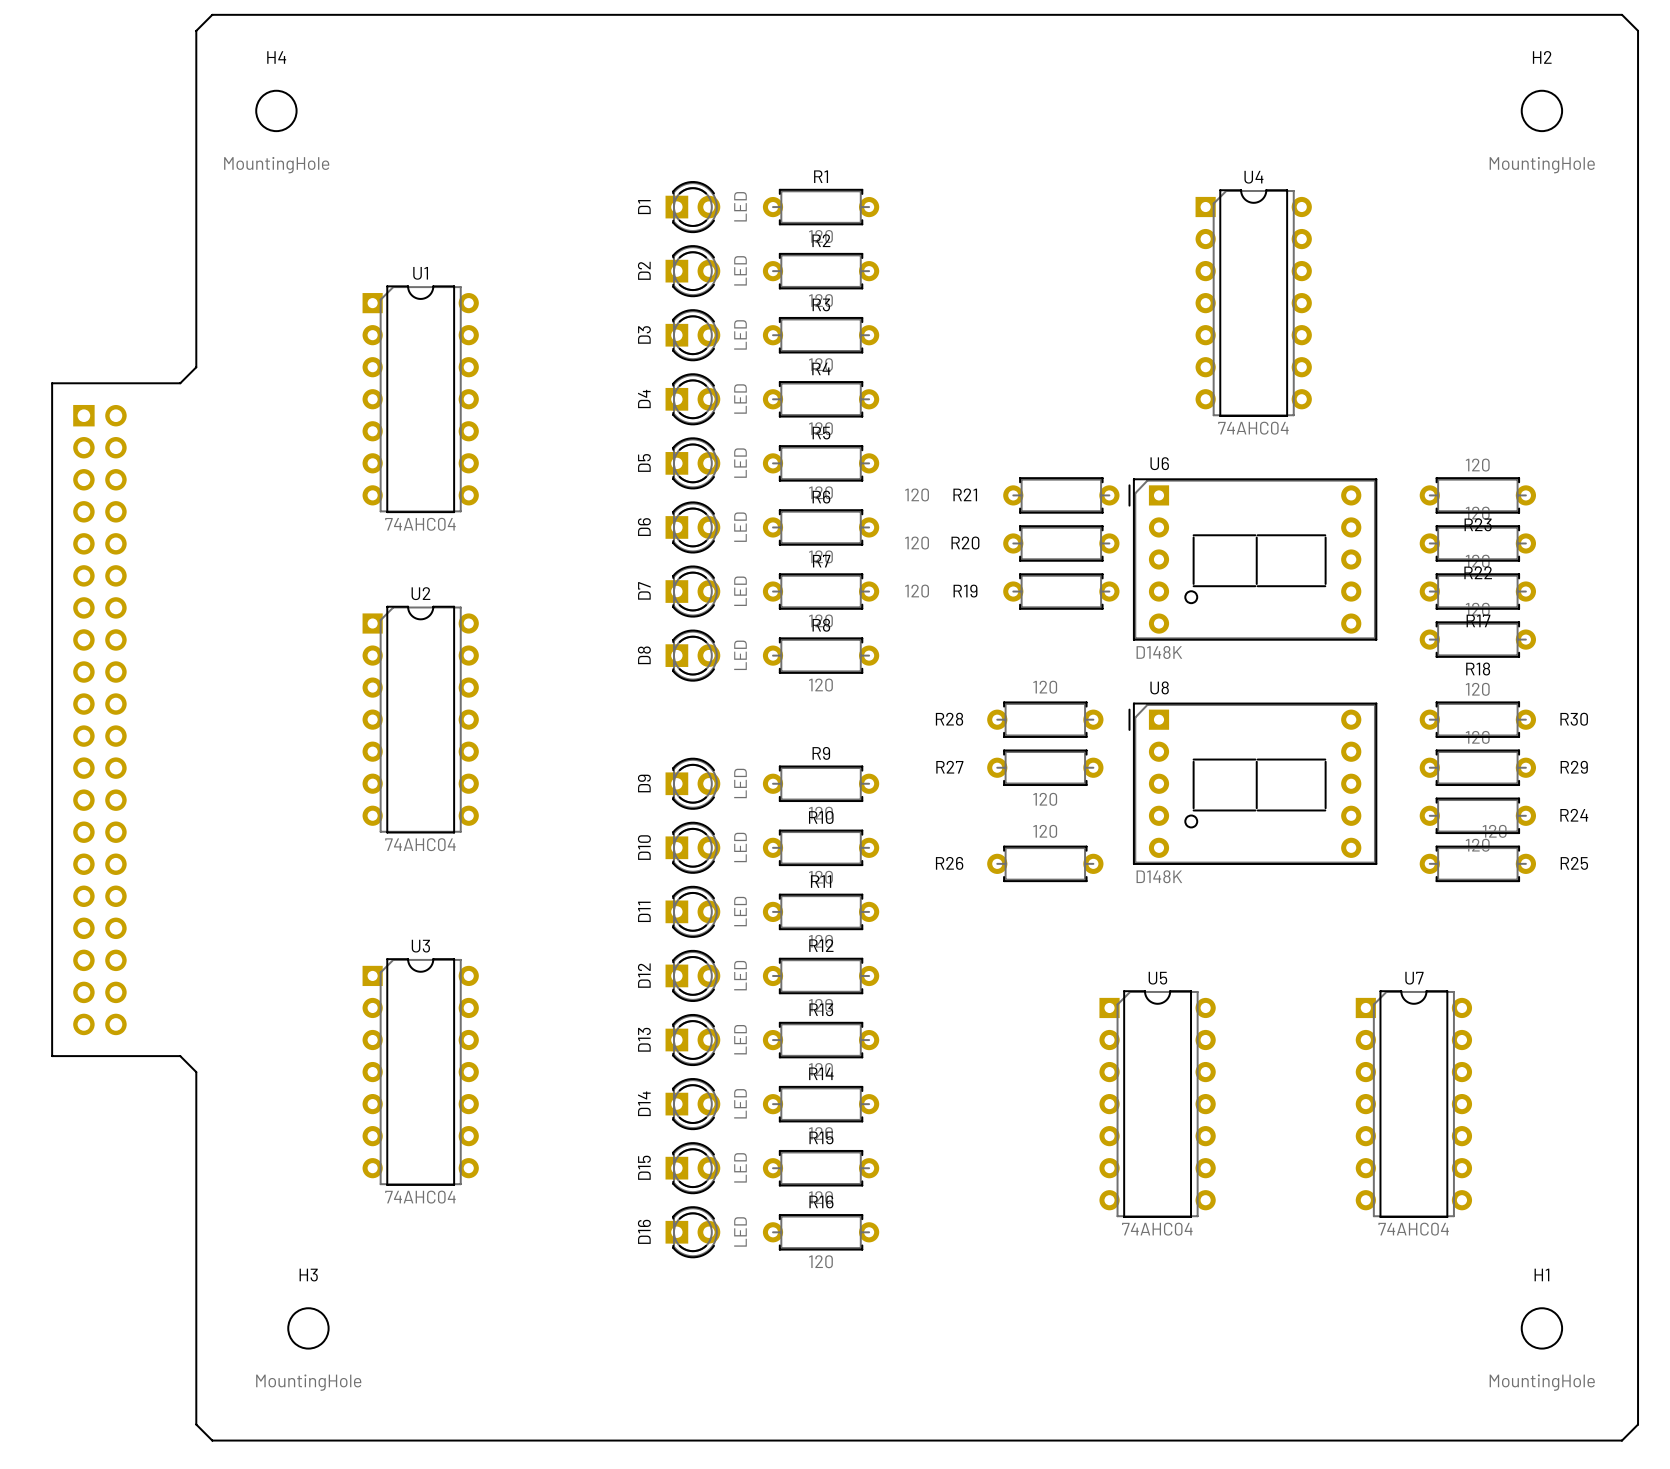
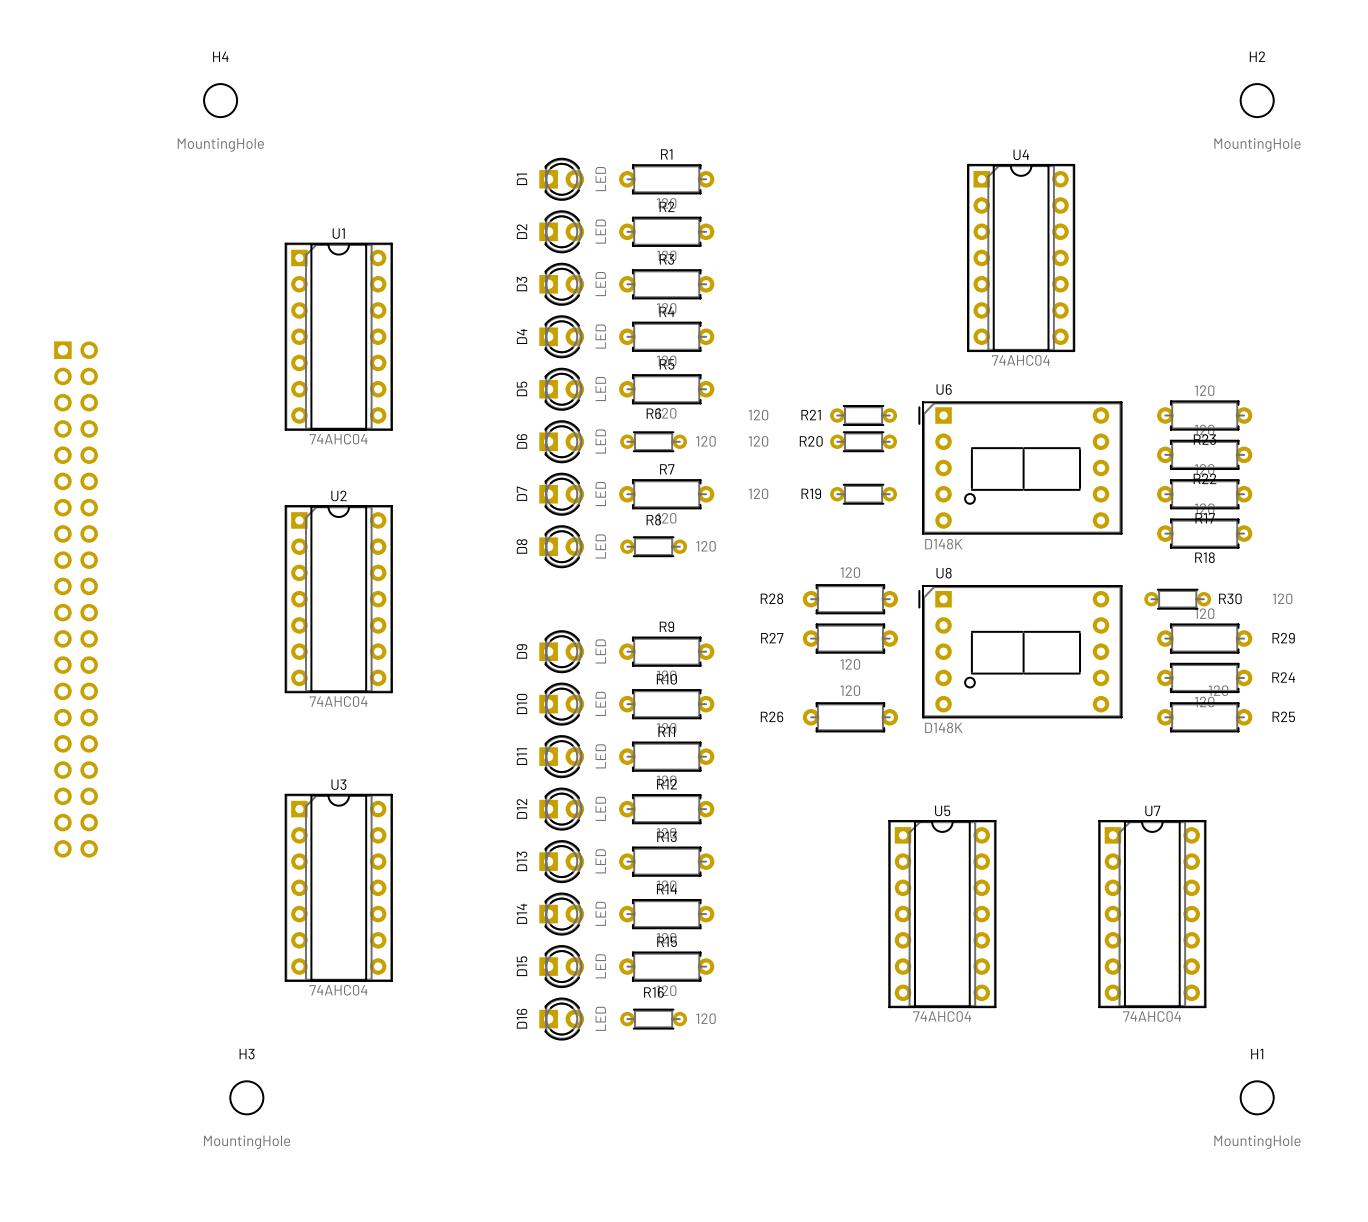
board edge: (212, 14) (196, 30) (196, 367) (180, 383) (52, 383) (52, 1056) (180, 1056) (196, 1072) (196, 1424) (212, 1440) (1622, 1440) (1638, 1424) (1638, 30) (1622, 14) (212, 14) -> none
U4 footprint: [1195, 189, 1312, 417] -> [967, 164, 1075, 352]
U1 footprint: [362, 285, 479, 513] -> [285, 243, 393, 431]
R21 footprint: [1003, 477, 1120, 514] -> [830, 405, 898, 426]
R21 name position: R21 (965, 494) -> R21 (811, 415)
R6 footprint: [762, 509, 880, 546] -> [620, 431, 688, 452]
R20 footprint: [1003, 525, 1120, 562] -> [830, 431, 898, 452]
R20 name position: R20 (965, 543) -> R20 (811, 441)
R6 value position: 120 (820, 556) -> 120 (705, 441)
R19 footprint: [1003, 573, 1120, 610] -> [830, 484, 898, 505]
R19 name position: R19 (965, 591) -> R19 (811, 493)
U2 footprint: [362, 605, 479, 834] -> [285, 505, 393, 693]
R8 footprint: [762, 637, 880, 674] -> [620, 536, 688, 557]
R8 value position: 120 (820, 685) -> 120 (705, 546)
R30 value position: 120 (1477, 689) -> 120 (1282, 598)
R30 footprint: [1419, 701, 1536, 738] -> [1144, 589, 1212, 610]
R30 name position: R30 (1574, 719) -> R30 (1230, 598)
U3 footprint: [362, 958, 479, 1186] -> [285, 794, 393, 982]
U5 footprint: [1099, 990, 1216, 1218] -> [888, 820, 997, 1008]
U7 footprint: [1355, 990, 1473, 1218] -> [1098, 820, 1207, 1008]
R16 footprint: [762, 1214, 880, 1251] -> [620, 1008, 688, 1030]
R16 value position: 120 (820, 1261) -> 120 (705, 1018)

